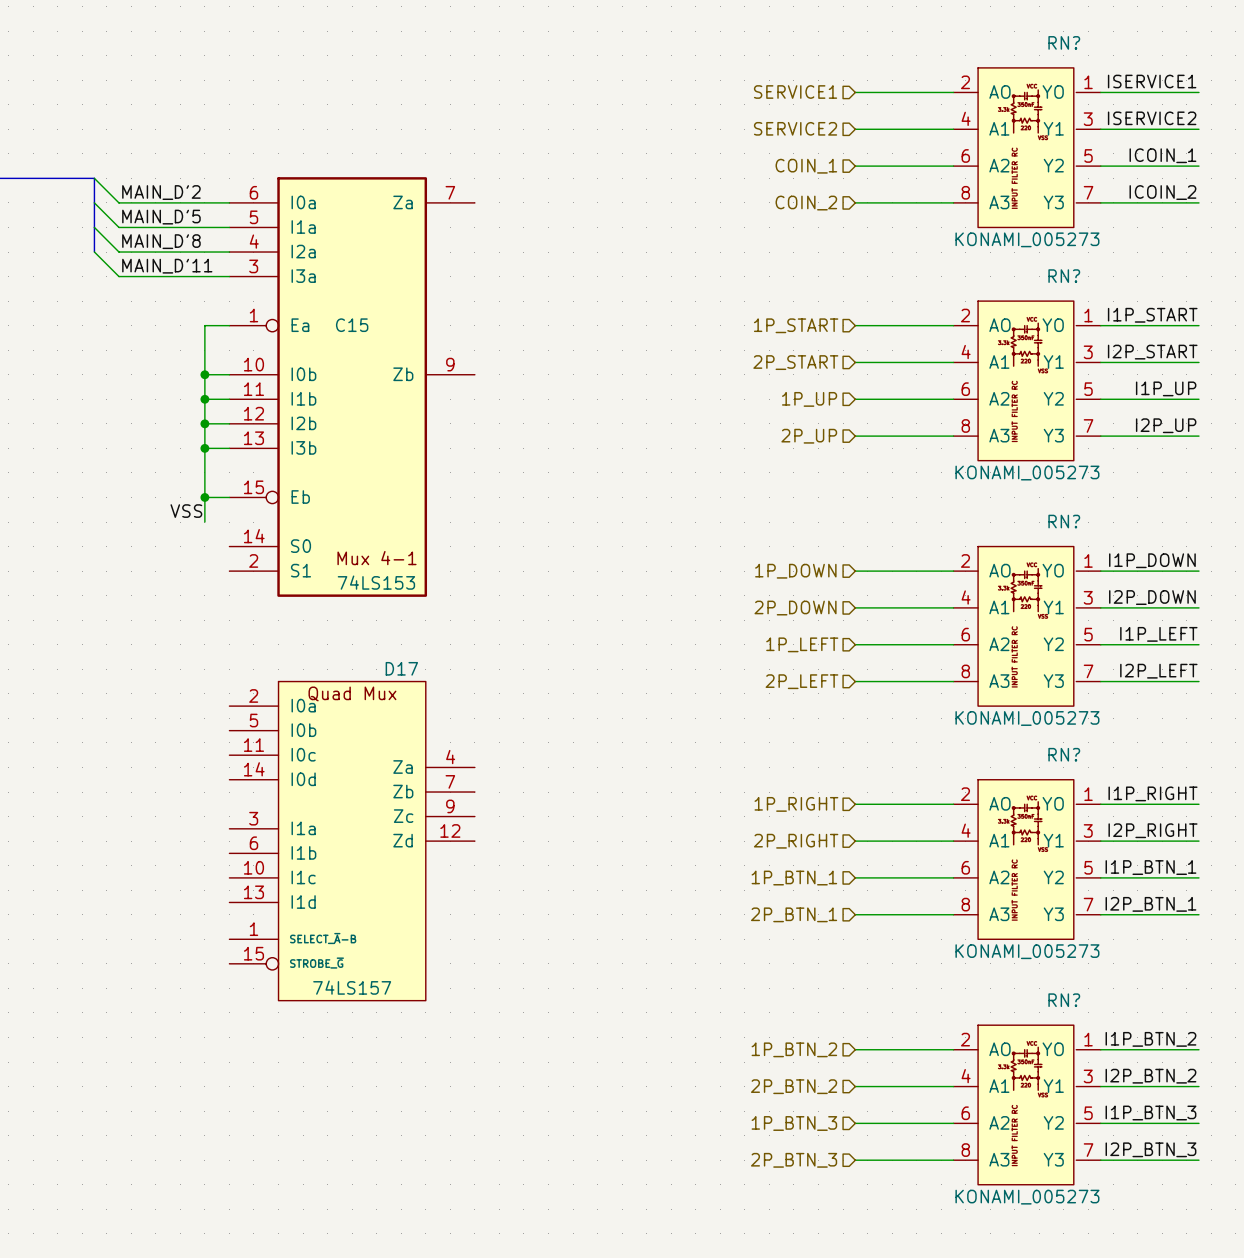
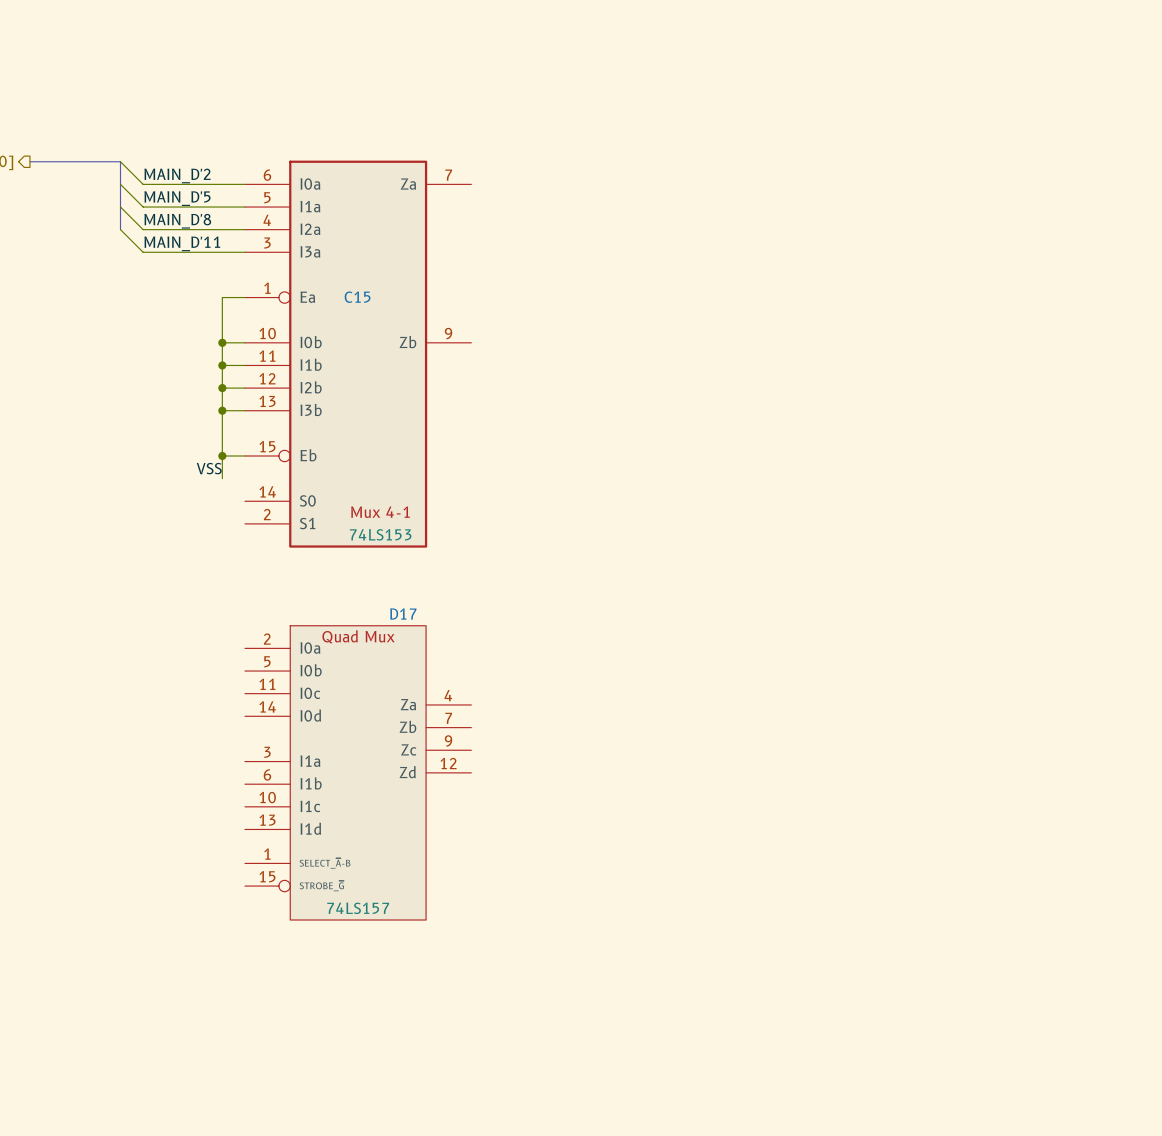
label: ISERVICE1 (1152, 81) -> none
hierarchical label: SERVICE1 (795, 92) -> none
wire: (855, 92) (953, 92) -> none
wire: (1100, 92) (1198, 92) -> none
label: ISERVICE2 (1152, 118) -> none
hierarchical label: SERVICE2 (795, 128) -> none
wire: (855, 129) (953, 129) -> none
wire: (1100, 129) (1198, 129) -> none
RN?: KONAMI_005273 (1027, 147) -> none
label: ICOIN_1 (1162, 155) -> none
hierarchical label: COIN_1 (806, 166) -> none
wire: (855, 166) (953, 166) -> none
wire: (1100, 166) (1198, 166) -> none
label: ICOIN_2 (1162, 192) -> none
wire: (855, 202) (953, 202) -> none
wire: (1100, 202) (1198, 202) -> none
hierarchical label: COIN_2 (806, 203) -> none
label: I1P_START (1152, 315) -> none
hierarchical label: 1P_START (796, 325) -> none
wire: (855, 325) (953, 325) -> none
wire: (1100, 325) (1198, 325) -> none
label: I2P_START (1152, 352) -> none
hierarchical label: 2P_START (795, 362) -> none
wire: (855, 362) (953, 362) -> none
wire: (1100, 362) (1198, 362) -> none
RN?: KONAMI_005273 (1027, 380) -> none
label: I1P_UP (1166, 388) -> none
hierarchical label: 1P_UP (809, 399) -> none
wire: (855, 399) (953, 399) -> none
wire: (1100, 399) (1198, 399) -> none
label: I2P_UP (1166, 425) -> none
hierarchical label: 2P_UP (809, 436) -> none
wire: (855, 436) (953, 436) -> none
wire: (1100, 436) (1198, 436) -> none
label: I1P_DOWN (1152, 560) -> none
hierarchical label: 1P_DOWN (795, 571) -> none
wire: (855, 571) (953, 571) -> none
wire: (1100, 571) (1198, 571) -> none
label: I2P_DOWN (1152, 597) -> none
wire: (855, 607) (953, 607) -> none
wire: (1100, 607) (1198, 607) -> none
hierarchical label: 2P_DOWN (795, 608) -> none
RN?: KONAMI_005273 (1027, 626) -> none
label: I1P_LEFT (1158, 634) -> none
hierarchical label: 1P_LEFT (802, 644) -> none
wire: (855, 644) (953, 644) -> none
wire: (1100, 644) (1198, 644) -> none
label: I2P_LEFT (1158, 671) -> none
hierarchical label: 2P_LEFT (801, 681) -> none
wire: (855, 681) (953, 681) -> none
wire: (1100, 681) (1198, 681) -> none
label: I1P_RIGHT (1153, 793) -> none
hierarchical label: 1P_RIGHT (796, 804) -> none
wire: (855, 804) (953, 804) -> none
wire: (1100, 804) (1198, 804) -> none
label: I2P_RIGHT (1153, 830) -> none
hierarchical label: 2P_RIGHT (796, 841) -> none
wire: (855, 841) (953, 841) -> none
wire: (1100, 841) (1198, 841) -> none
RN?: KONAMI_005273 (1027, 859) -> none
label: I1P_BTN_1 (1150, 867) -> none
wire: (855, 877) (953, 877) -> none
wire: (1100, 877) (1198, 877) -> none
hierarchical label: 1P_BTN_1 (794, 878) -> none
label: I2P_BTN_1 (1150, 904) -> none
hierarchical label: 2P_BTN_1 (794, 914) -> none
wire: (855, 914) (953, 914) -> none
wire: (1100, 914) (1198, 914) -> none
label: I1P_BTN_2 (1150, 1039) -> none
hierarchical label: 1P_BTN_2 (794, 1049) -> none
wire: (855, 1049) (953, 1049) -> none
wire: (1100, 1049) (1198, 1049) -> none
label: I2P_BTN_2 (1150, 1076) -> none
hierarchical label: 2P_BTN_2 (794, 1086) -> none
wire: (855, 1086) (953, 1086) -> none
wire: (1100, 1086) (1198, 1086) -> none
RN?: KONAMI_005273 (1027, 1104) -> none
label: I1P_BTN_3 (1150, 1113) -> none
hierarchical label: 1P_BTN_3 (794, 1123) -> none
wire: (855, 1123) (953, 1123) -> none
wire: (1100, 1123) (1198, 1123) -> none
label: I2P_BTN_3 (1150, 1149) -> none
hierarchical label: 2P_BTN_3 (794, 1160) -> none
wire: (855, 1160) (953, 1160) -> none
wire: (1100, 1160) (1198, 1160) -> none

